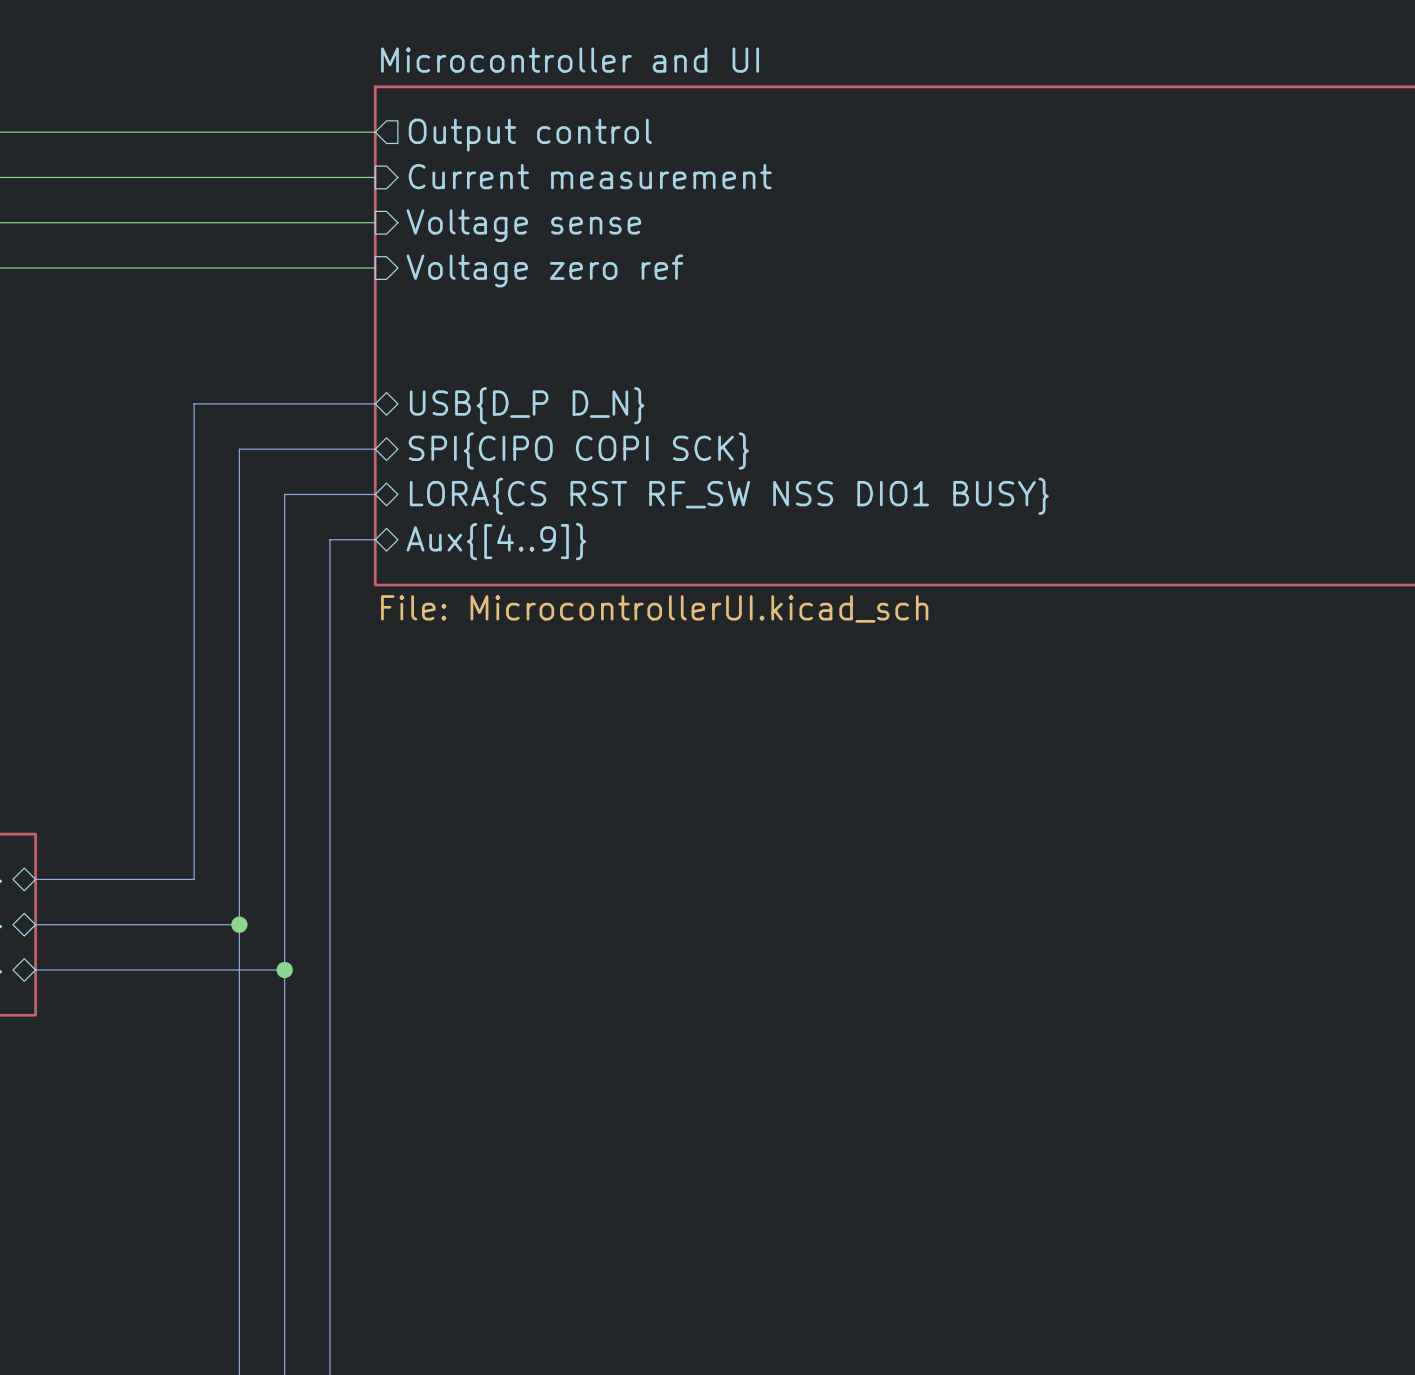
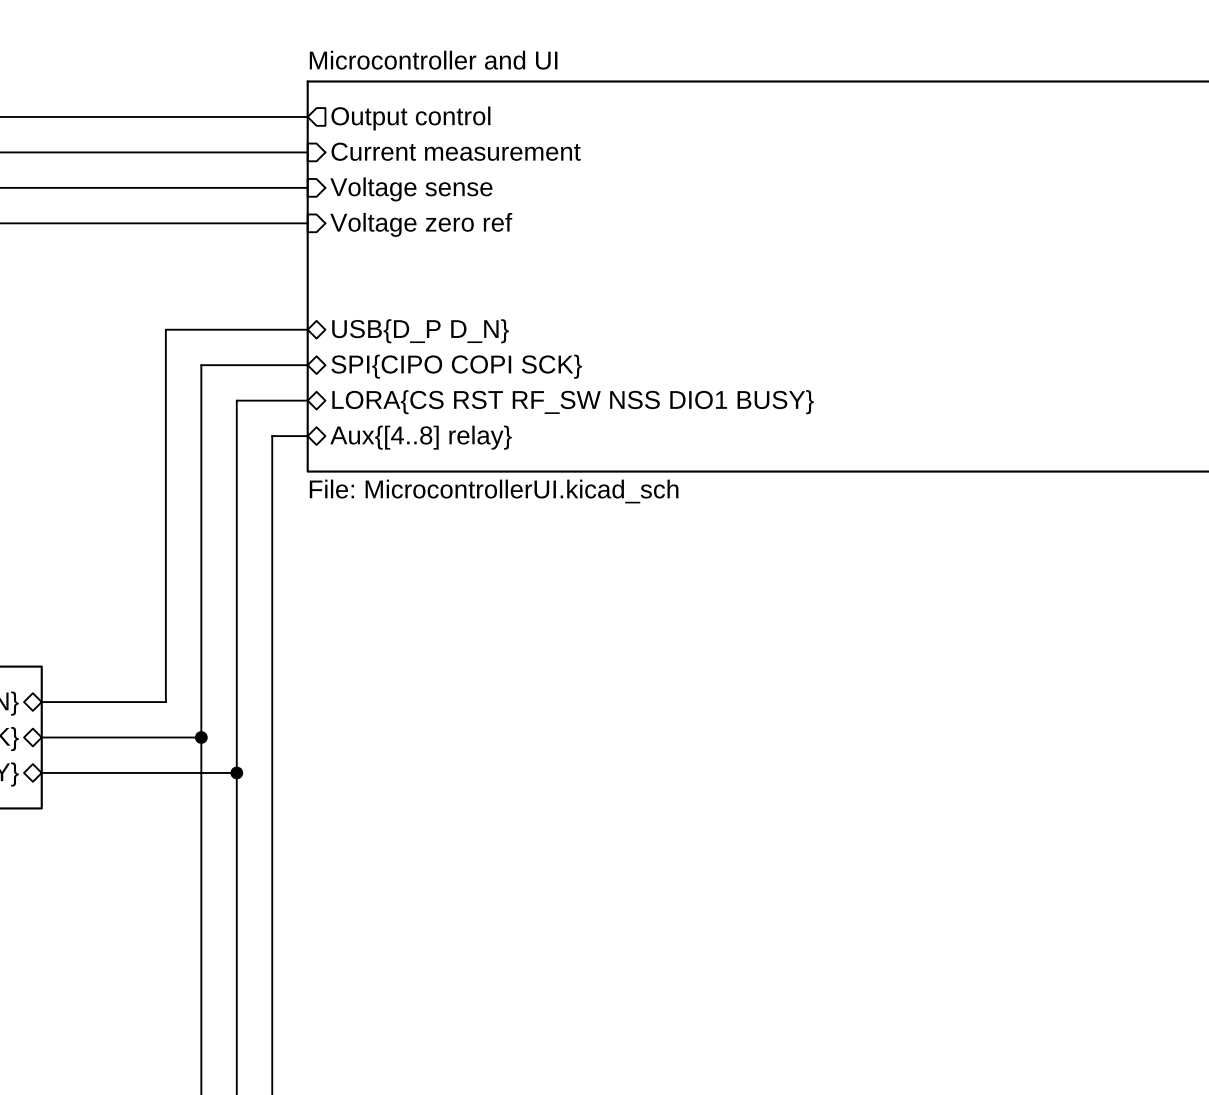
sheet pin: Aux{[4..9]} (496, 541) -> Aux{[4..8] relay} (421, 437)

